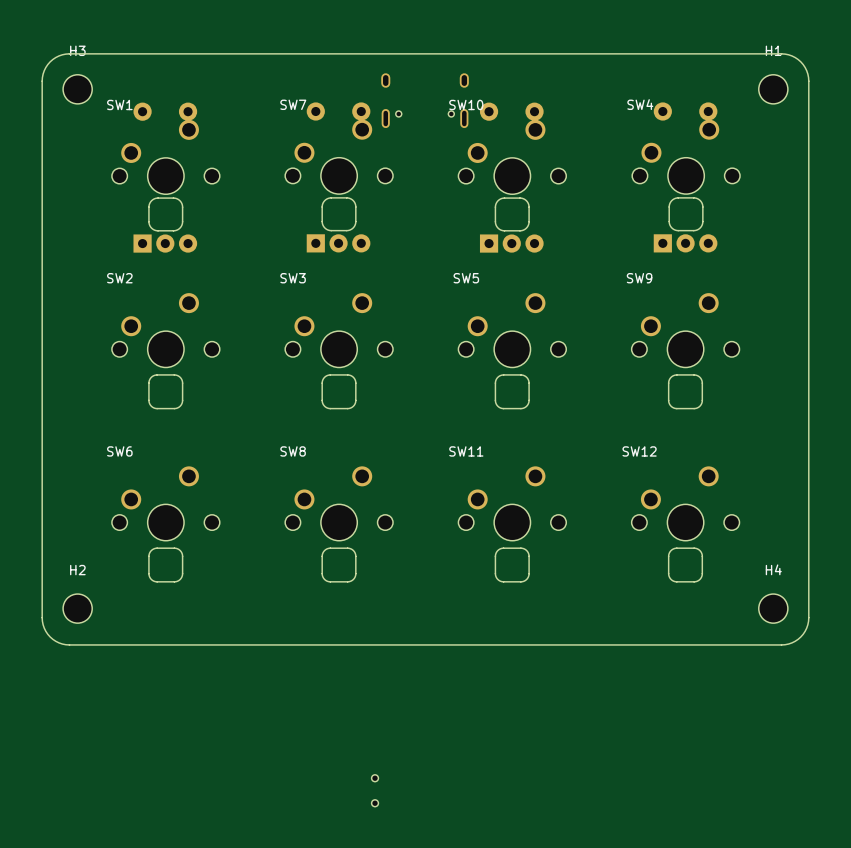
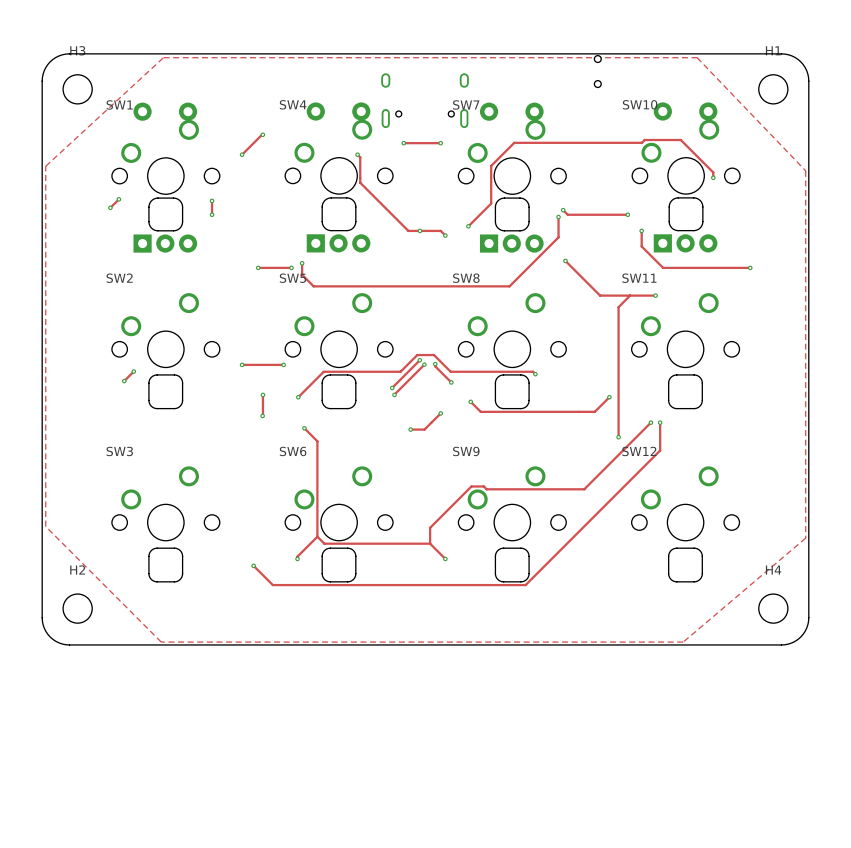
zone outline: none -> (163, 57) (45, 166) (45, 526) (161, 642) (683, 642) (805, 538) (805, 170) (697, 57) (163, 57)
part: none -> (597, 71)
SW7 name: SW7 (293, 104) -> SW4 (293, 104)
SW10 name: SW10 (466, 104) -> SW7 (466, 104)
SW4 name: SW4 (640, 104) -> SW10 (640, 104)
track: none -> (262, 134) (242, 154)
via: none -> (262, 134)
track: none -> (403, 143) (440, 143)
via: none -> (403, 143)
via: none -> (440, 143)
via: none -> (242, 154)
track: none -> (357, 154) (360, 157) (360, 182) (408, 230) (440, 230) (445, 235)
via: none -> (357, 154)
track: none -> (713, 177) (713, 172) (680, 140) (644, 140) (641, 142) (514, 142) (491, 165) (491, 203) (468, 226)
via: none -> (713, 177)
track: none -> (118, 199) (110, 207)
via: none -> (118, 199)
track: none -> (212, 200) (212, 214)
via: none -> (212, 200)
via: none -> (110, 207)
track: none -> (563, 210) (567, 214) (627, 214)
via: none -> (563, 210)
via: none -> (212, 214)
via: none -> (627, 214)
track: none -> (558, 217) (558, 237) (509, 286) (313, 286) (302, 274) (302, 263)
via: none -> (558, 217)
via: none -> (468, 226)
via: none -> (419, 230)
track: none -> (641, 230) (641, 246) (663, 267) (750, 267)
via: none -> (641, 230)
via: none -> (445, 235)
track: none -> (565, 260) (600, 295) (655, 295)
via: none -> (565, 260)
via: none -> (302, 263)
track: none -> (258, 267) (291, 267)
via: none -> (258, 267)
via: none -> (291, 267)
via: none -> (750, 267)
SW3 name: SW3 (293, 278) -> SW5 (292, 278)
SW5 name: SW5 (466, 278) -> SW8 (466, 278)
SW9 name: SW9 (639, 278) -> SW11 (639, 278)
track: none -> (630, 295) (618, 307) (618, 437)
via: none -> (655, 295)
track: none -> (419, 360) (392, 387)
via: none -> (419, 360)
track: none -> (242, 364) (283, 364)
via: none -> (242, 364)
via: none -> (283, 364)
track: none -> (424, 364) (394, 394)
via: none -> (424, 364)
track: none -> (435, 364) (435, 366) (451, 382)
via: none -> (435, 364)
track: none -> (133, 371) (124, 381)
via: none -> (133, 371)
track: none -> (535, 374) (533, 371) (450, 371) (434, 355) (417, 355) (400, 371) (323, 371) (298, 397)
via: none -> (535, 374)
via: none -> (124, 381)
via: none -> (451, 382)
via: none -> (392, 387)
track: none -> (262, 394) (262, 415)
via: none -> (262, 394)
via: none -> (394, 394)
via: none -> (298, 397)
track: none -> (609, 397) (594, 411) (480, 411) (470, 401)
via: none -> (609, 397)
via: none -> (470, 401)
track: none -> (440, 413) (424, 429) (410, 429)
via: none -> (440, 413)
via: none -> (262, 415)
track: none -> (650, 422) (584, 489) (486, 489) (483, 486) (471, 486) (430, 527) (430, 543)
via: none -> (650, 422)
track: none -> (660, 422) (660, 450) (525, 585) (272, 585) (253, 565)
via: none -> (660, 422)
track: none -> (304, 428) (317, 441) (317, 536)
via: none -> (304, 428)
via: none -> (410, 429)
via: none -> (618, 437)
SW6 name: SW6 (119, 451) -> SW3 (119, 451)
SW8 name: SW8 (293, 451) -> SW6 (293, 451)
SW11 name: SW11 (466, 451) -> SW9 (466, 451)
track: none -> (317, 536) (297, 556) (297, 558)
track: none -> (317, 536) (324, 543) (430, 543)
track: none -> (430, 543) (445, 558)
via: none -> (297, 558)
via: none -> (445, 558)
via: none -> (253, 565)
part: (375, 790) -> none

